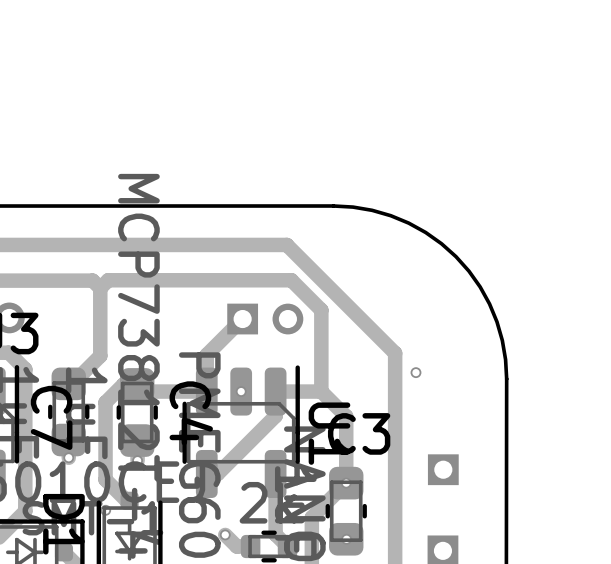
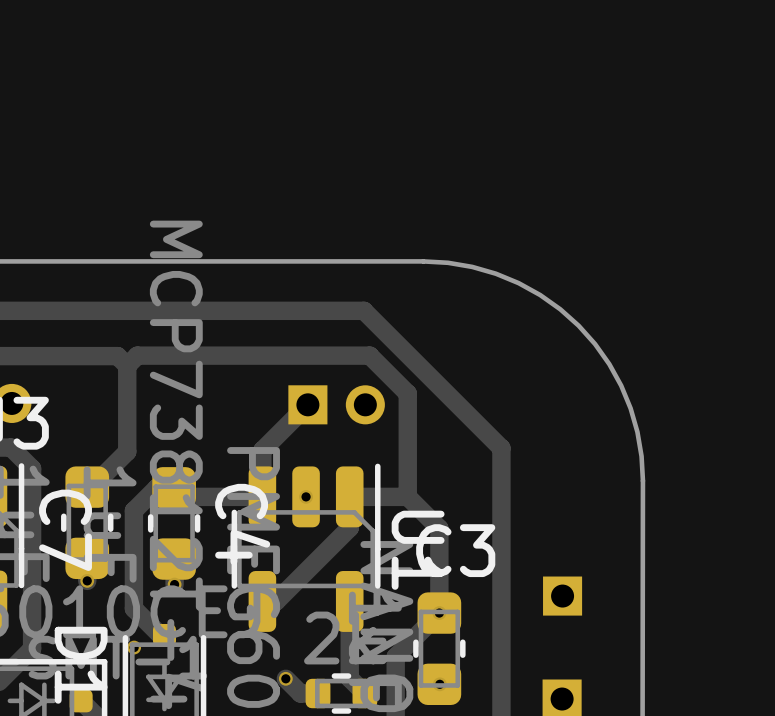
via: (415, 372) -> none

